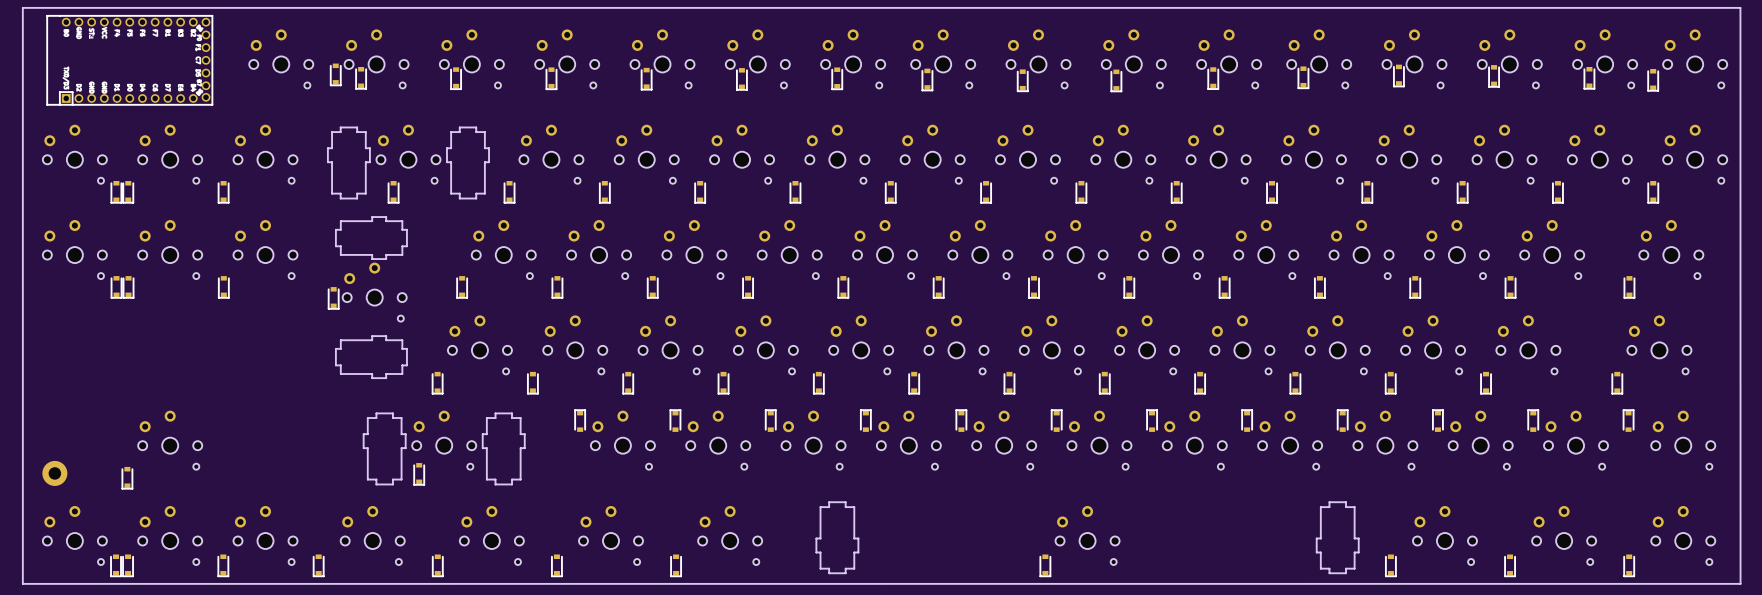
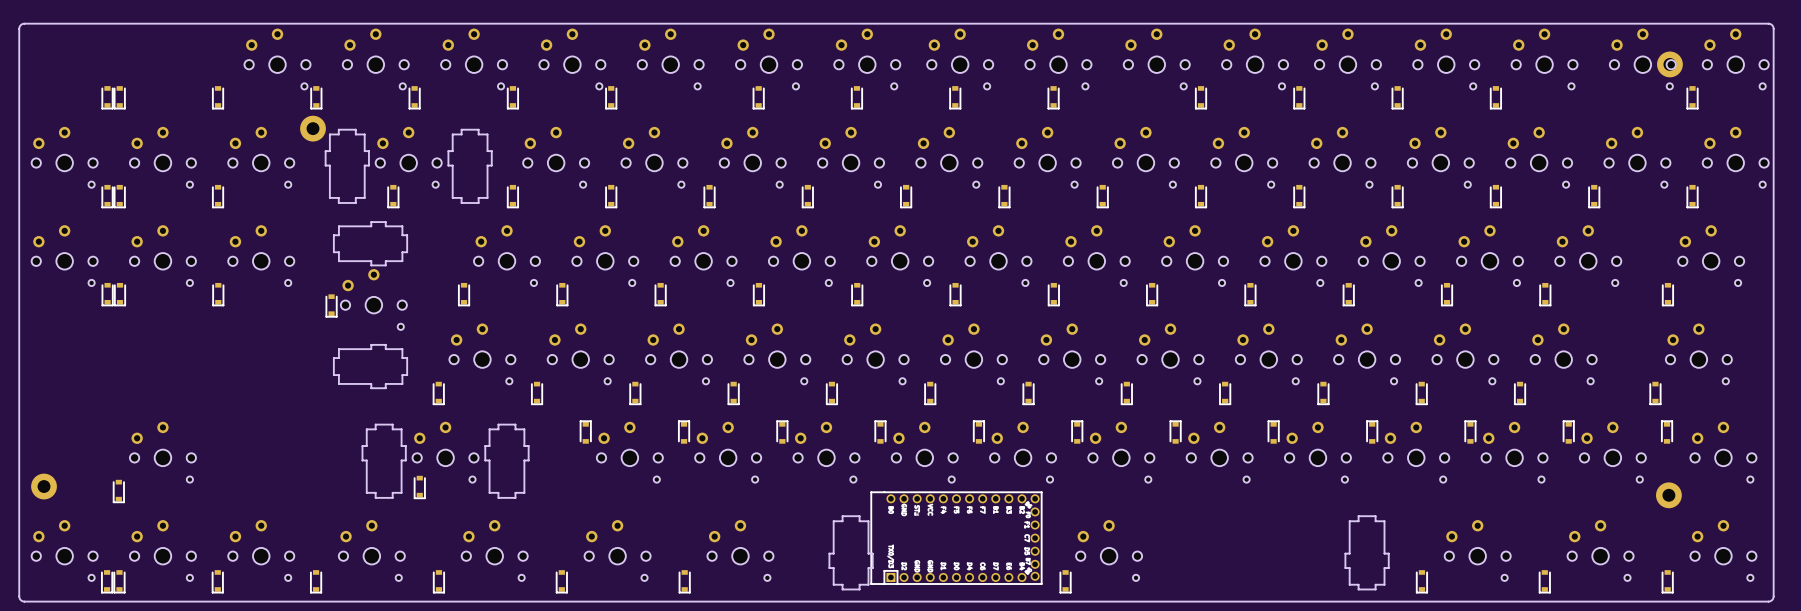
board edge: (1740, 7) (22, 7) (22, 583) (1740, 583) (1740, 7) -> (1768, 23) (1772, 25) (1773, 28) (1773, 596) (1769, 601) (24, 601) (19, 597) (19, 28) (23, 23) (1768, 23)
part: (129, 60) -> none
part: none -> (1669, 64)
part: (335, 74) -> none
part: (1398, 75) -> none
part: (1494, 76) -> none
part: (1303, 77) -> none
part: (361, 78) -> none
part: (456, 78) -> none
part: (551, 78) -> none
part: (646, 78) -> none
part position: (837, 78) -> (856, 97)
part: (1213, 78) -> none
part: (1589, 78) -> none
part position: (741, 79) -> (758, 97)
part position: (927, 79) -> (955, 97)
part position: (1022, 80) -> (1053, 97)
part: (1116, 80) -> none
part position: (1653, 80) -> (1692, 97)
part: none -> (107, 97)
part: none -> (119, 97)
part: none -> (218, 97)
part: none -> (316, 97)
part: none -> (414, 97)
part: none -> (512, 97)
part: none -> (611, 97)
part: none -> (1201, 97)
part: none -> (1299, 97)
part: none -> (1397, 97)
part: none -> (1495, 97)
part: none -> (313, 128)
part: none -> (1668, 495)
part: none -> (956, 538)

